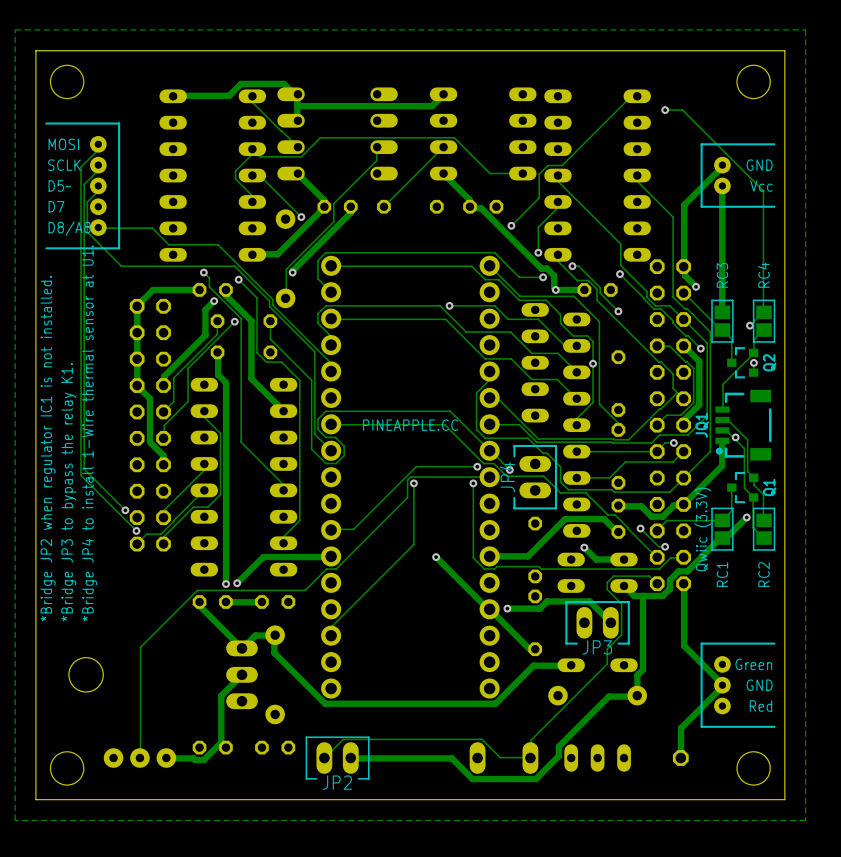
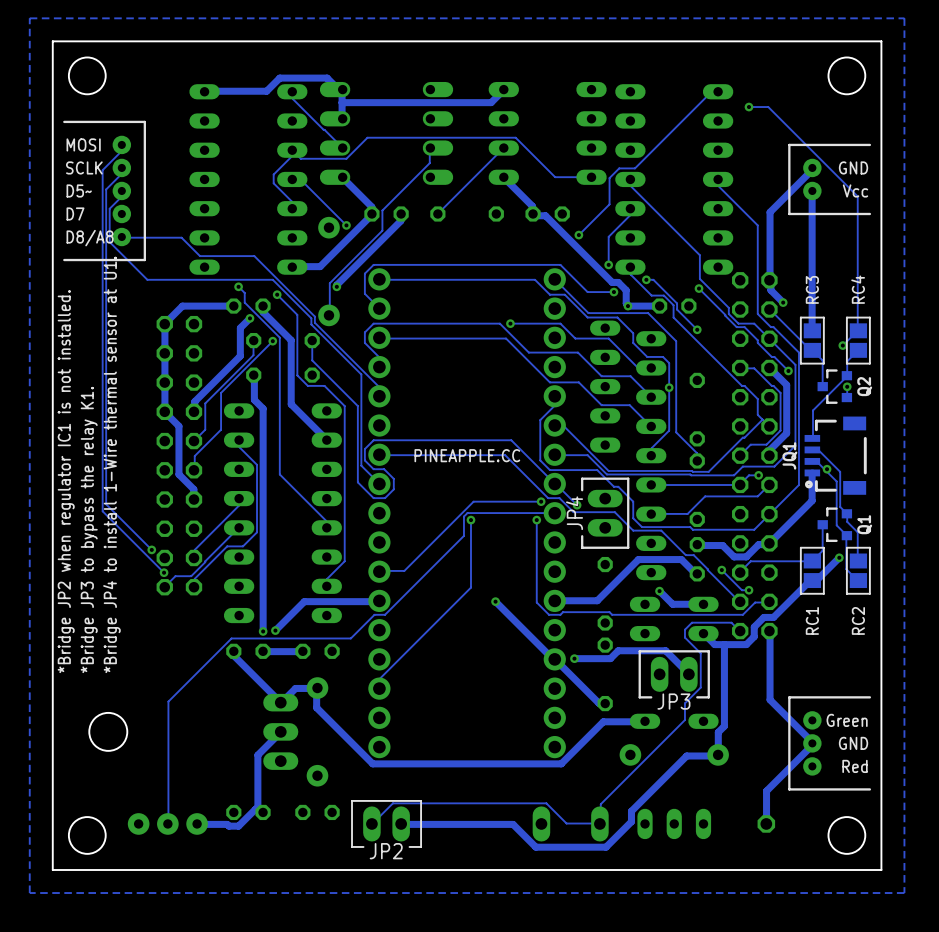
text: Qwiic (3.3V) (702, 529) -> none

